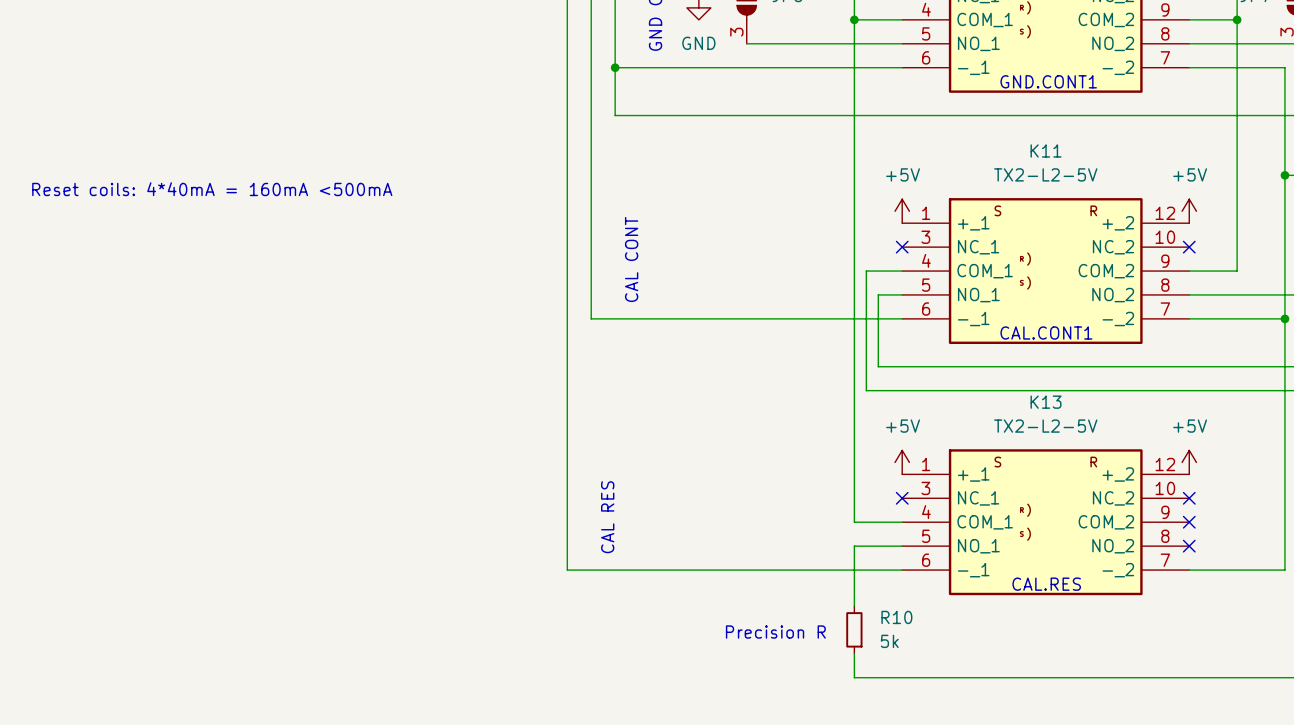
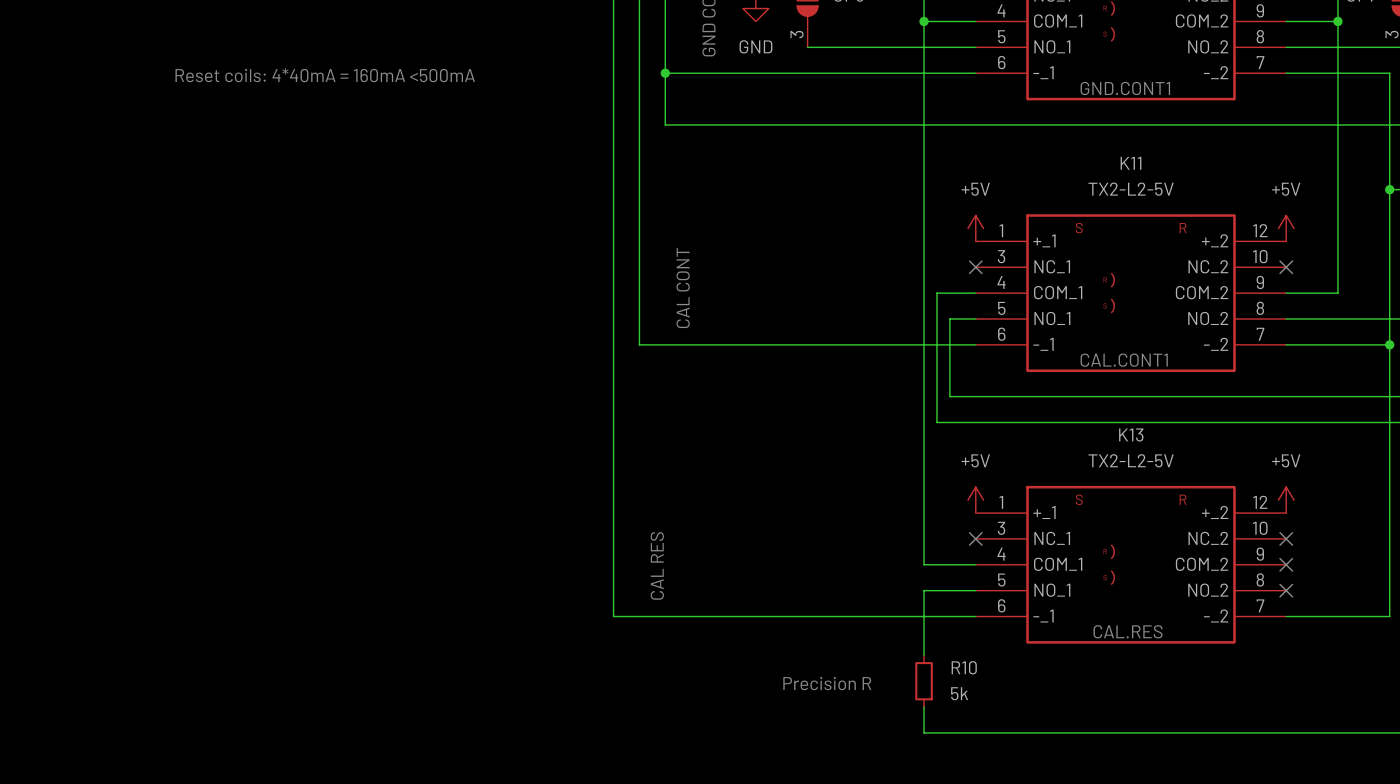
text position: Reset coils: 4*40mA = 160mA <500mA (212, 189) -> Reset coils: 4*40mA = 160mA <500mA (325, 75)

